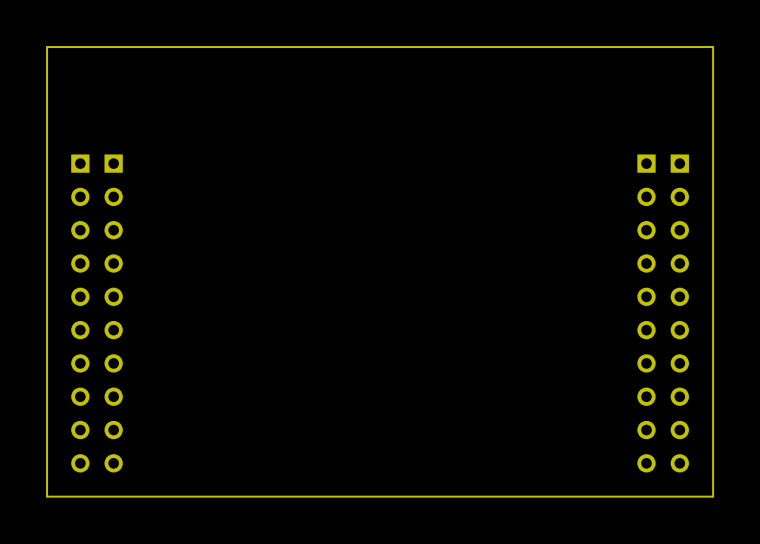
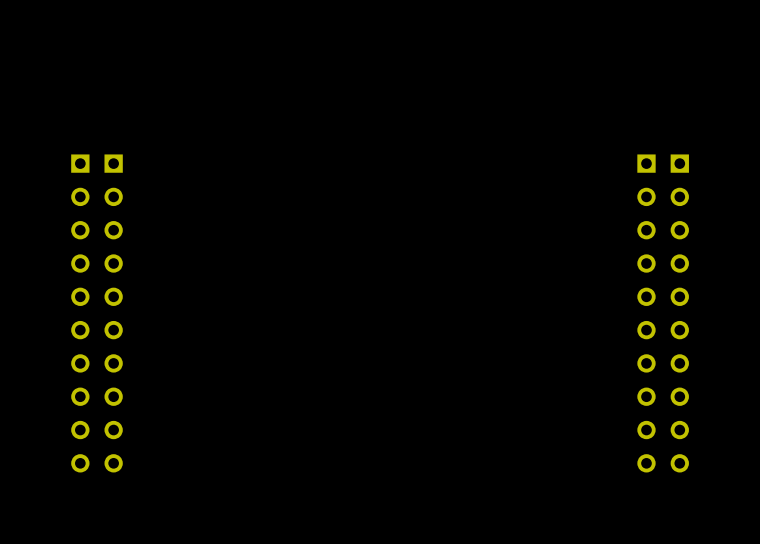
board edge: (713, 47) (713, 496) (47, 496) (47, 47) (713, 47) -> none

